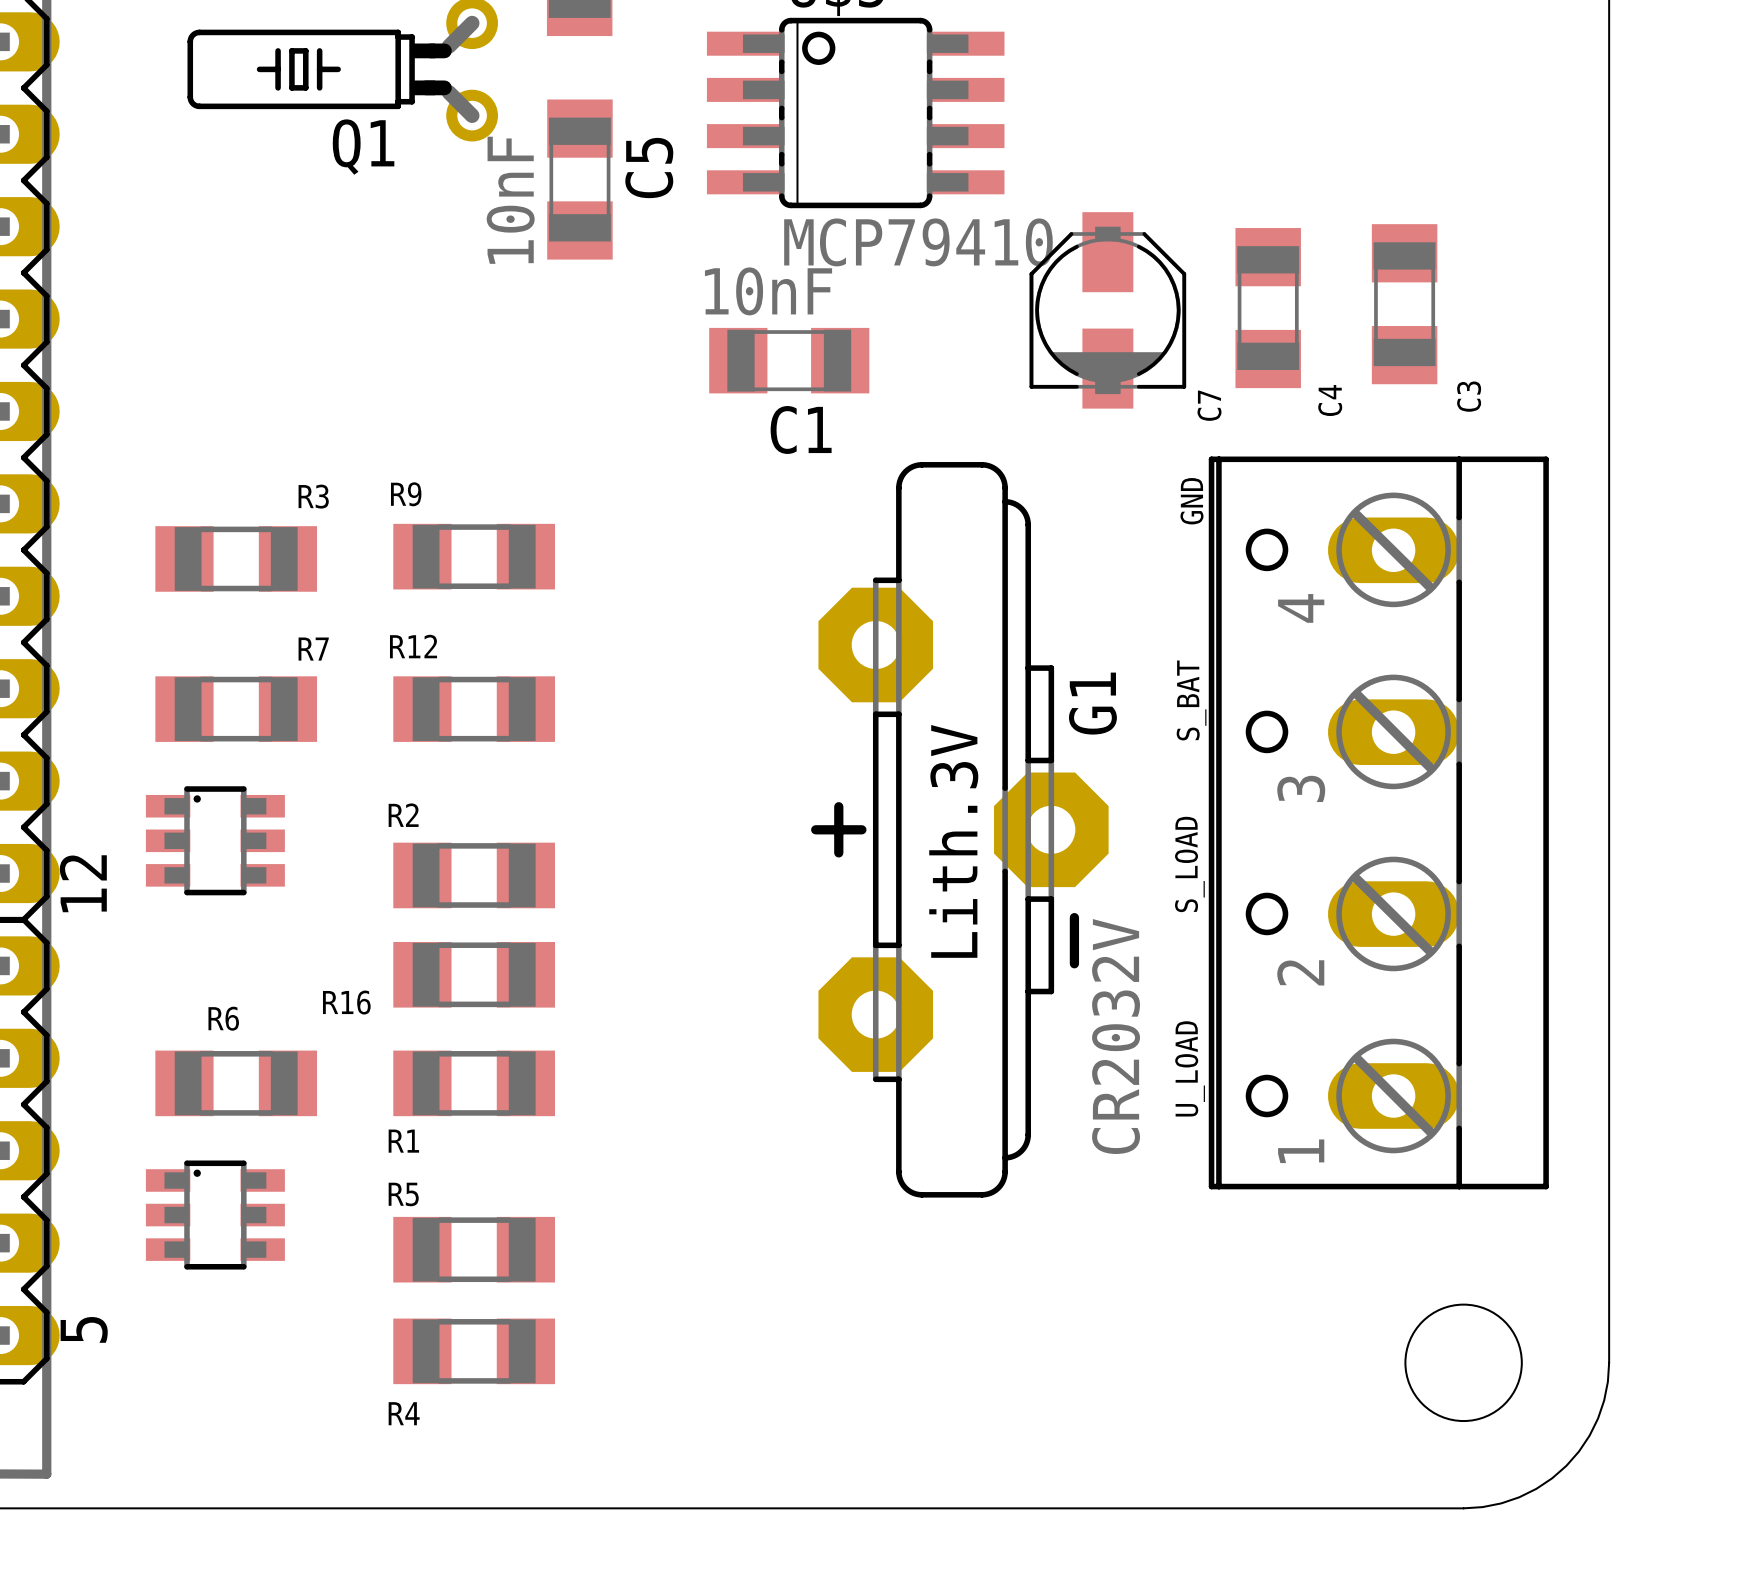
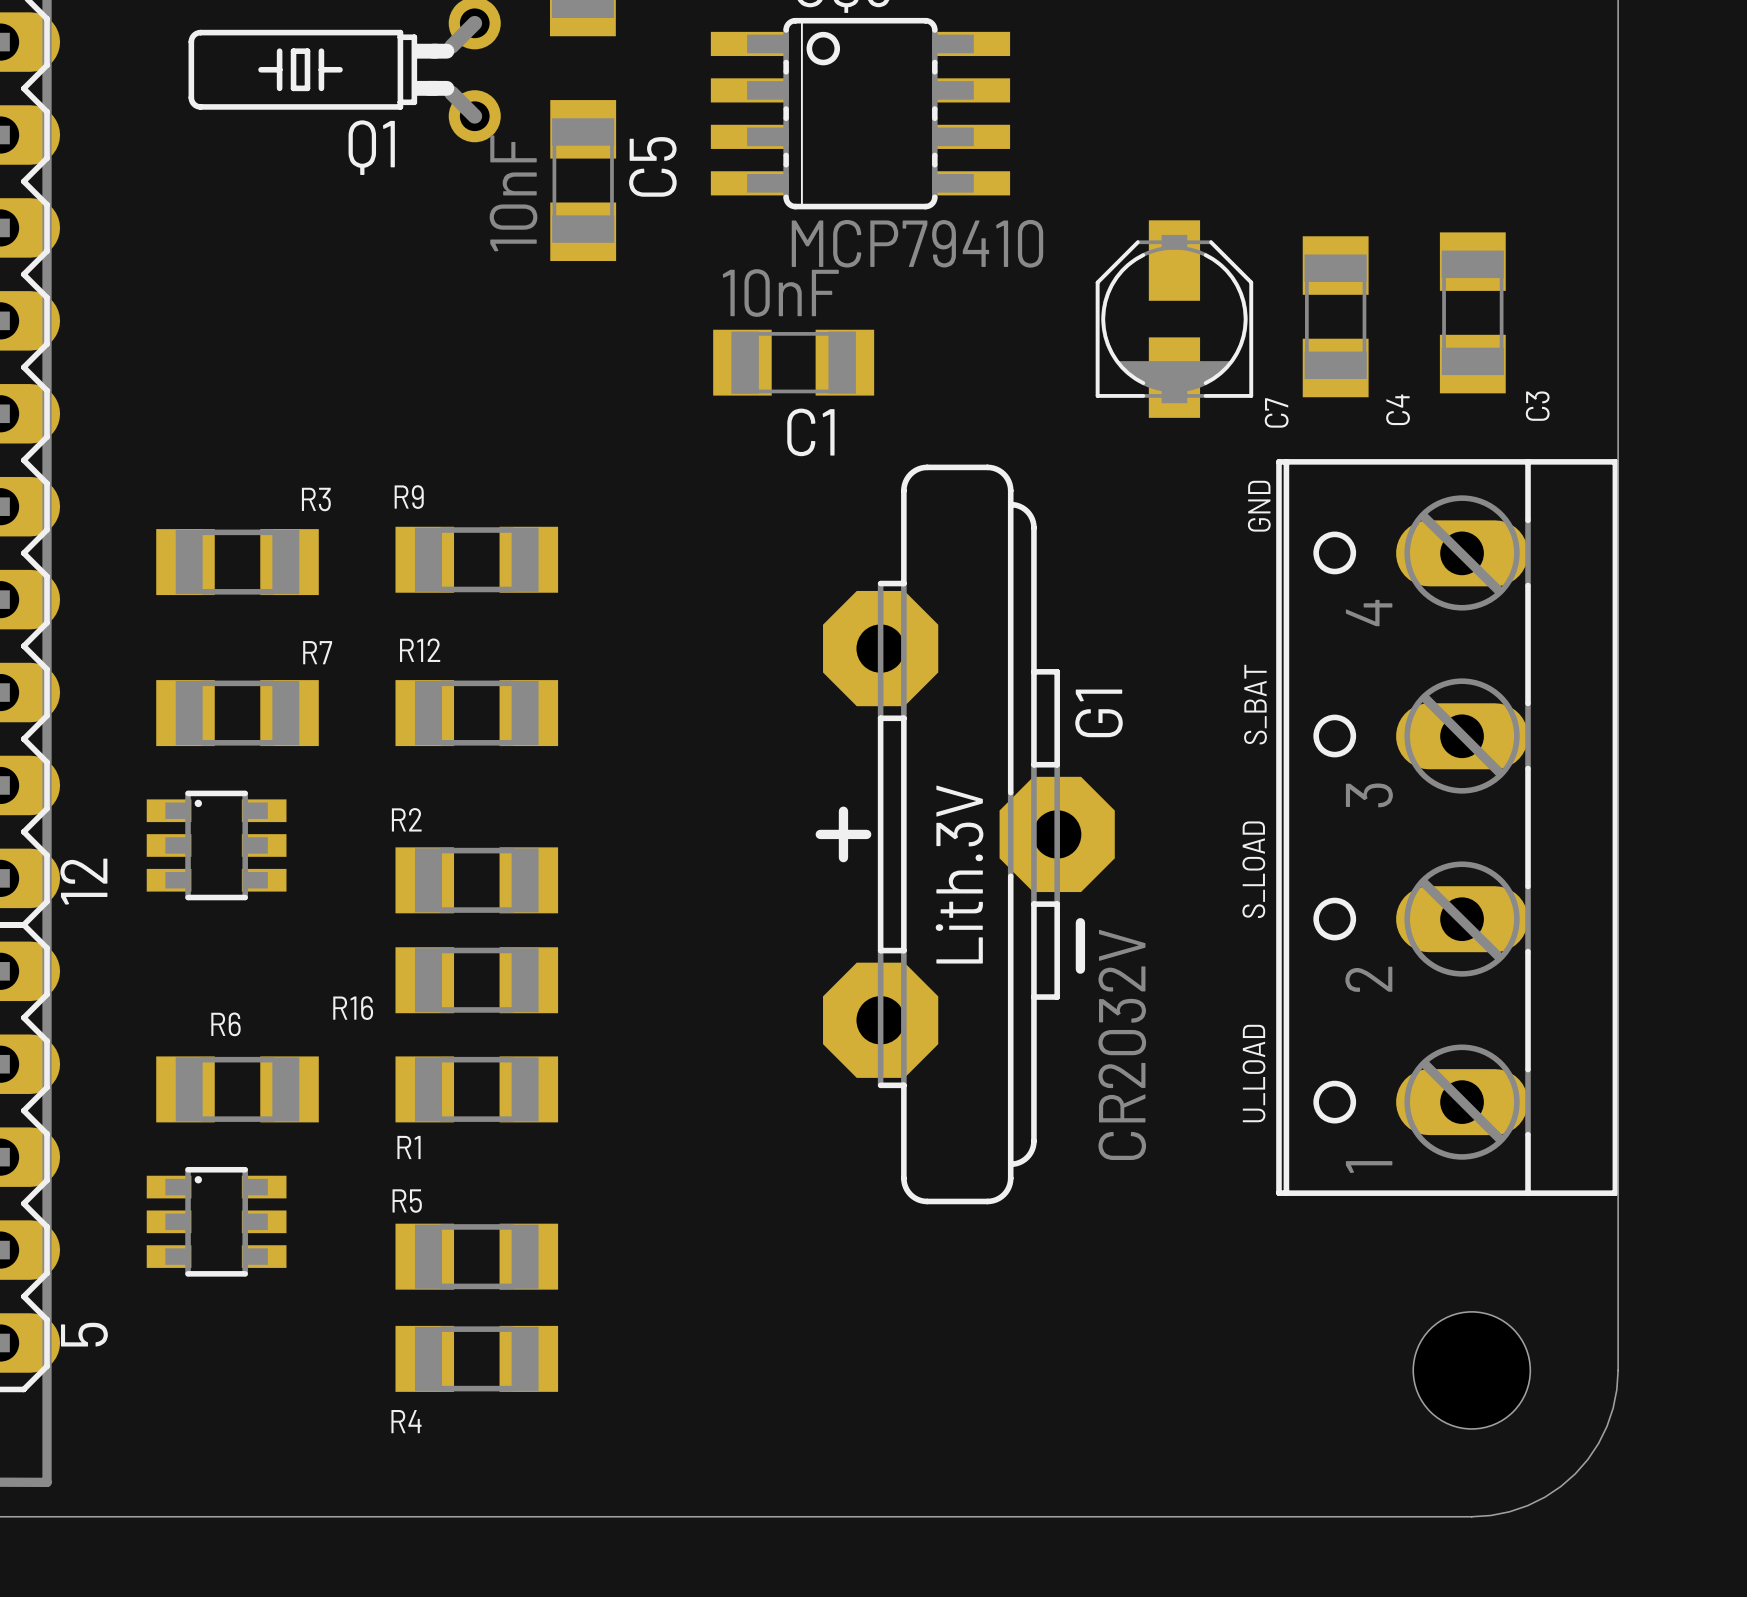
C3 position: (1404, 304) -> (1472, 312)
C4 position: (1268, 308) -> (1335, 316)
C7 position: (1107, 310) -> (1174, 319)
text position: GND (1191, 501) -> GND (1259, 506)
text position: S_BAT (1191, 700) -> S_BAT (1255, 704)
part position: (1378, 822) -> (1447, 827)
text position: S_LOAD (1189, 864) -> S_LOAD (1253, 869)
text position: U_LOAD (1190, 1068) -> U_LOAD (1253, 1073)

